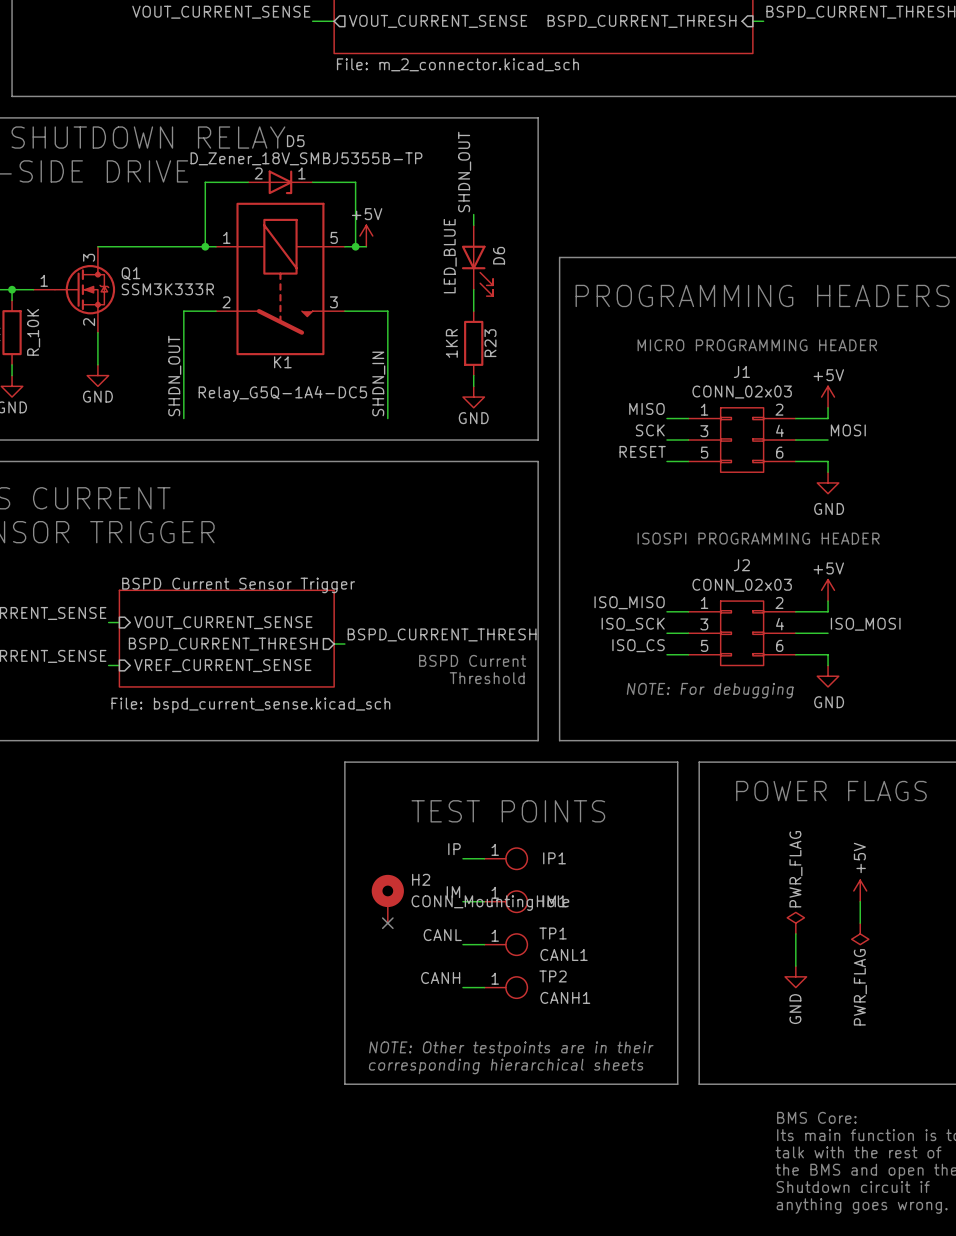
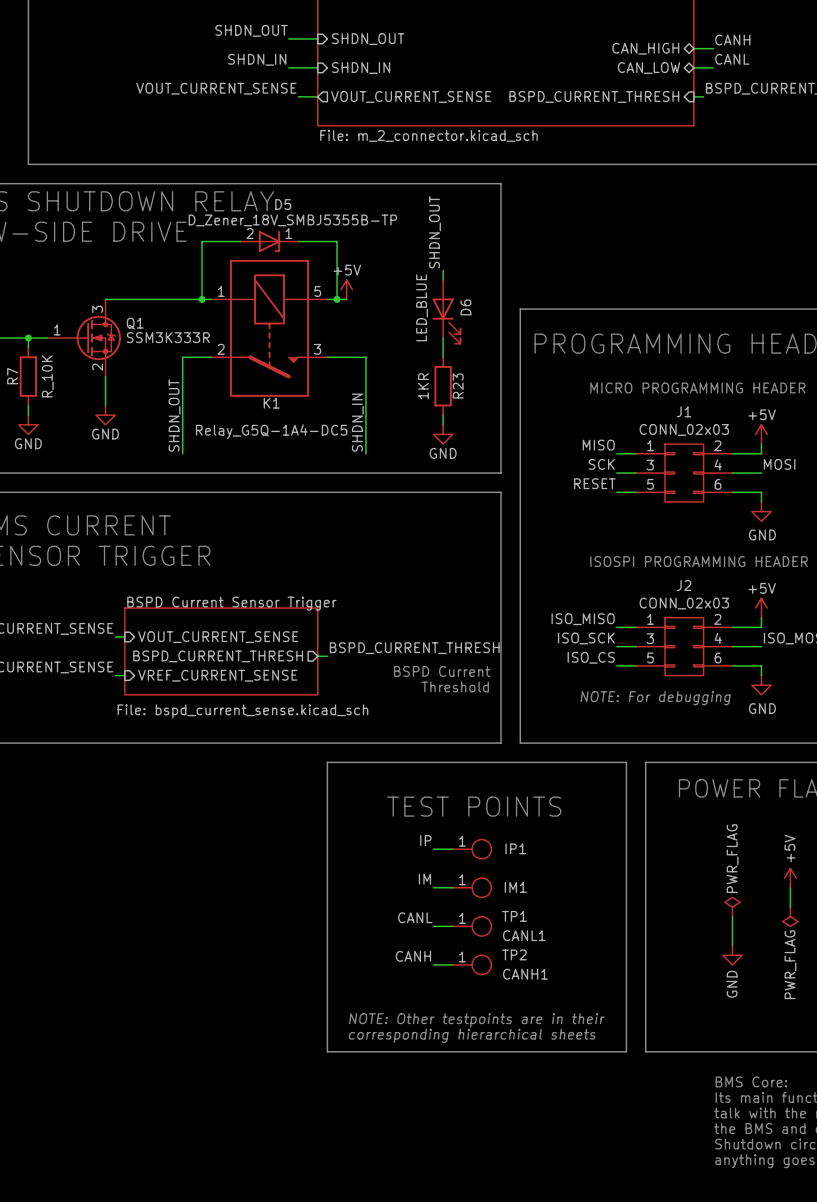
H2: CONN_MountingHole (387, 899) -> none
no-connect mark: (387, 923) -> none

